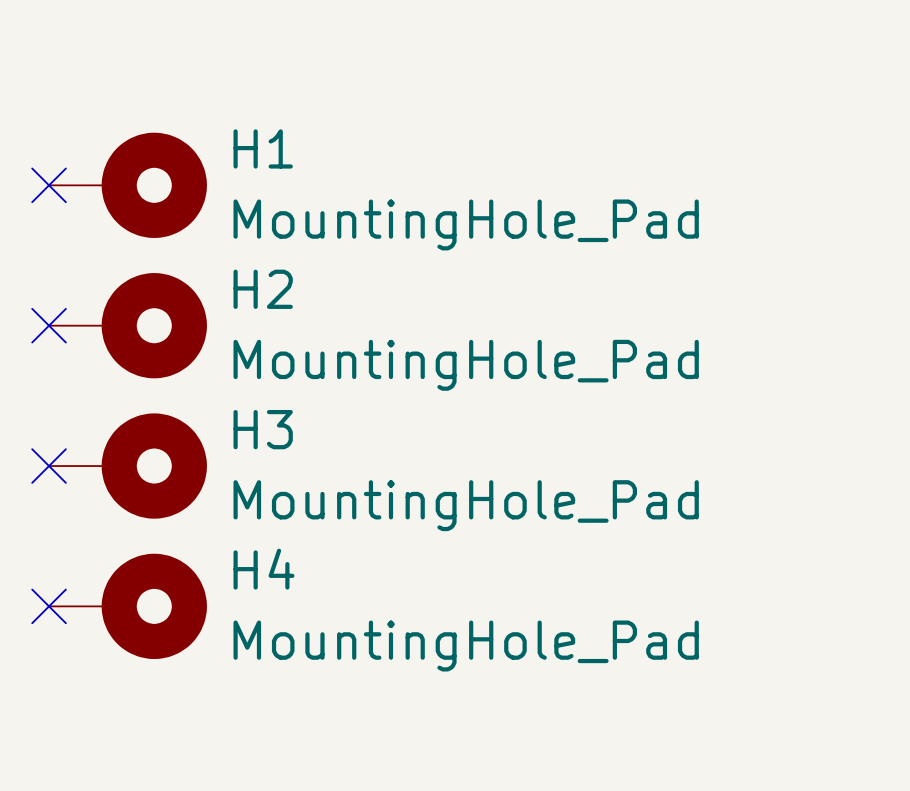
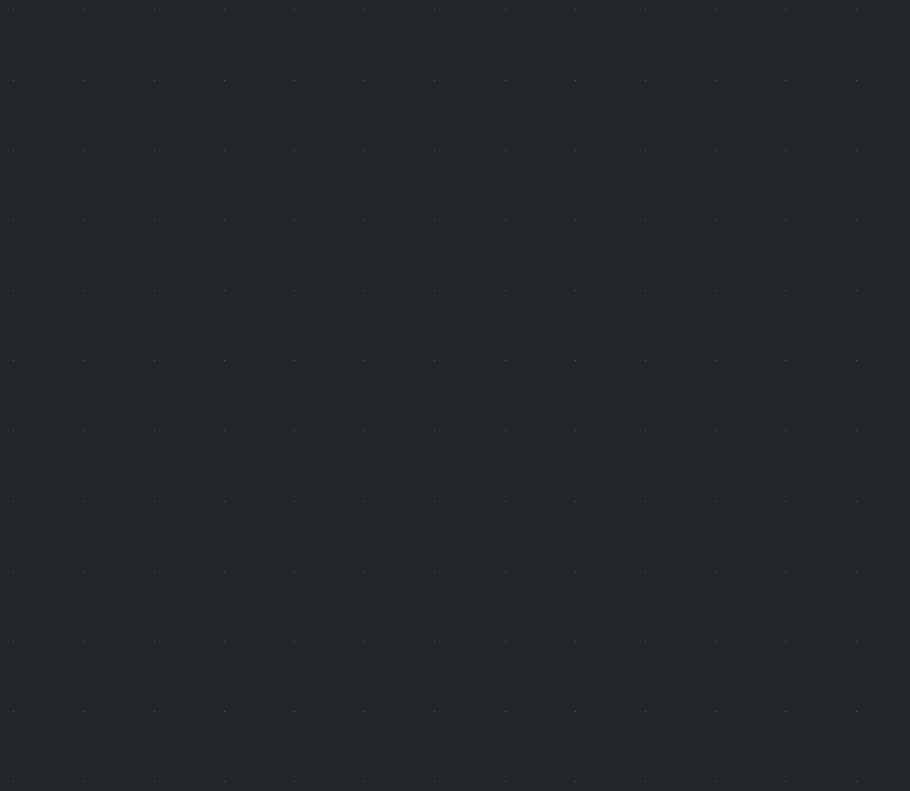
no-connect mark: (49, 185) -> none
H1: MountingHole_Pad (127, 185) -> none
no-connect mark: (49, 325) -> none
H2: MountingHole_Pad (127, 325) -> none
no-connect mark: (49, 466) -> none
H3: MountingHole_Pad (127, 466) -> none
no-connect mark: (49, 606) -> none
H4: MountingHole_Pad (127, 606) -> none

